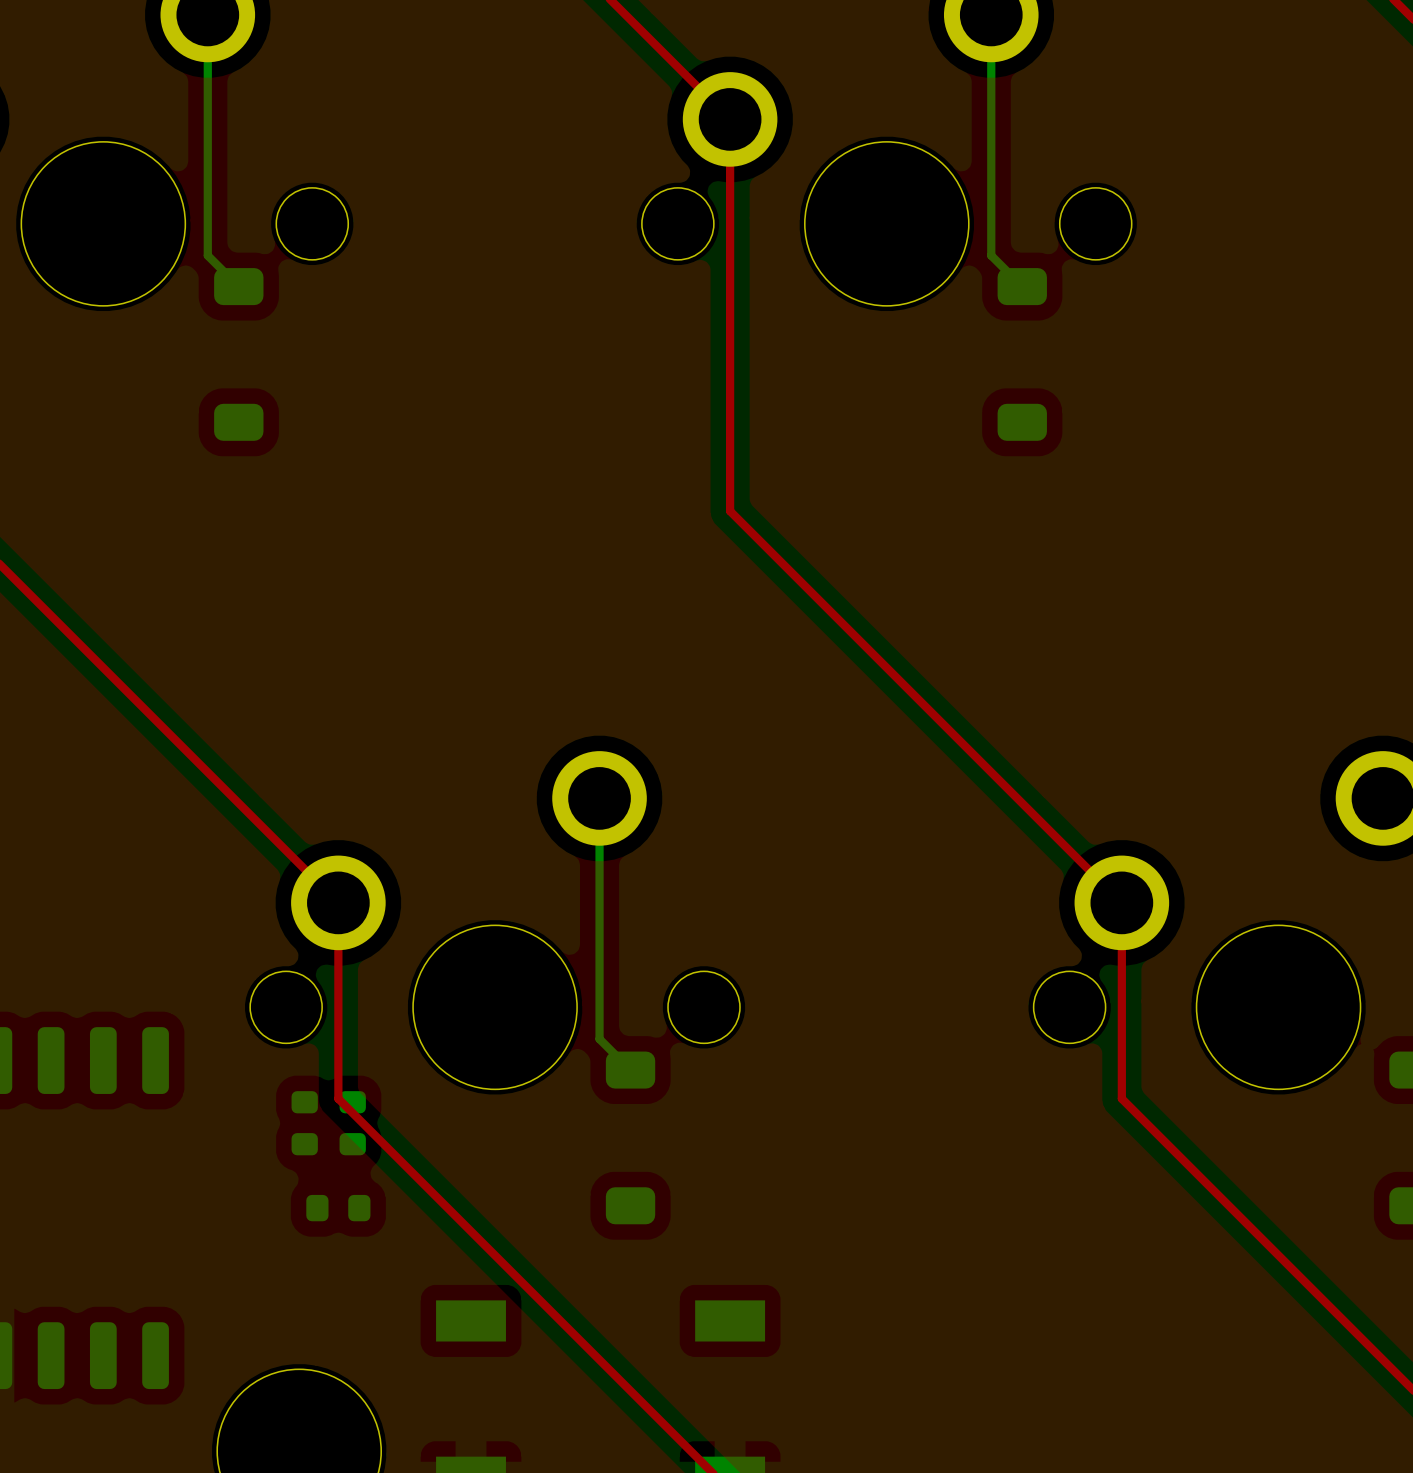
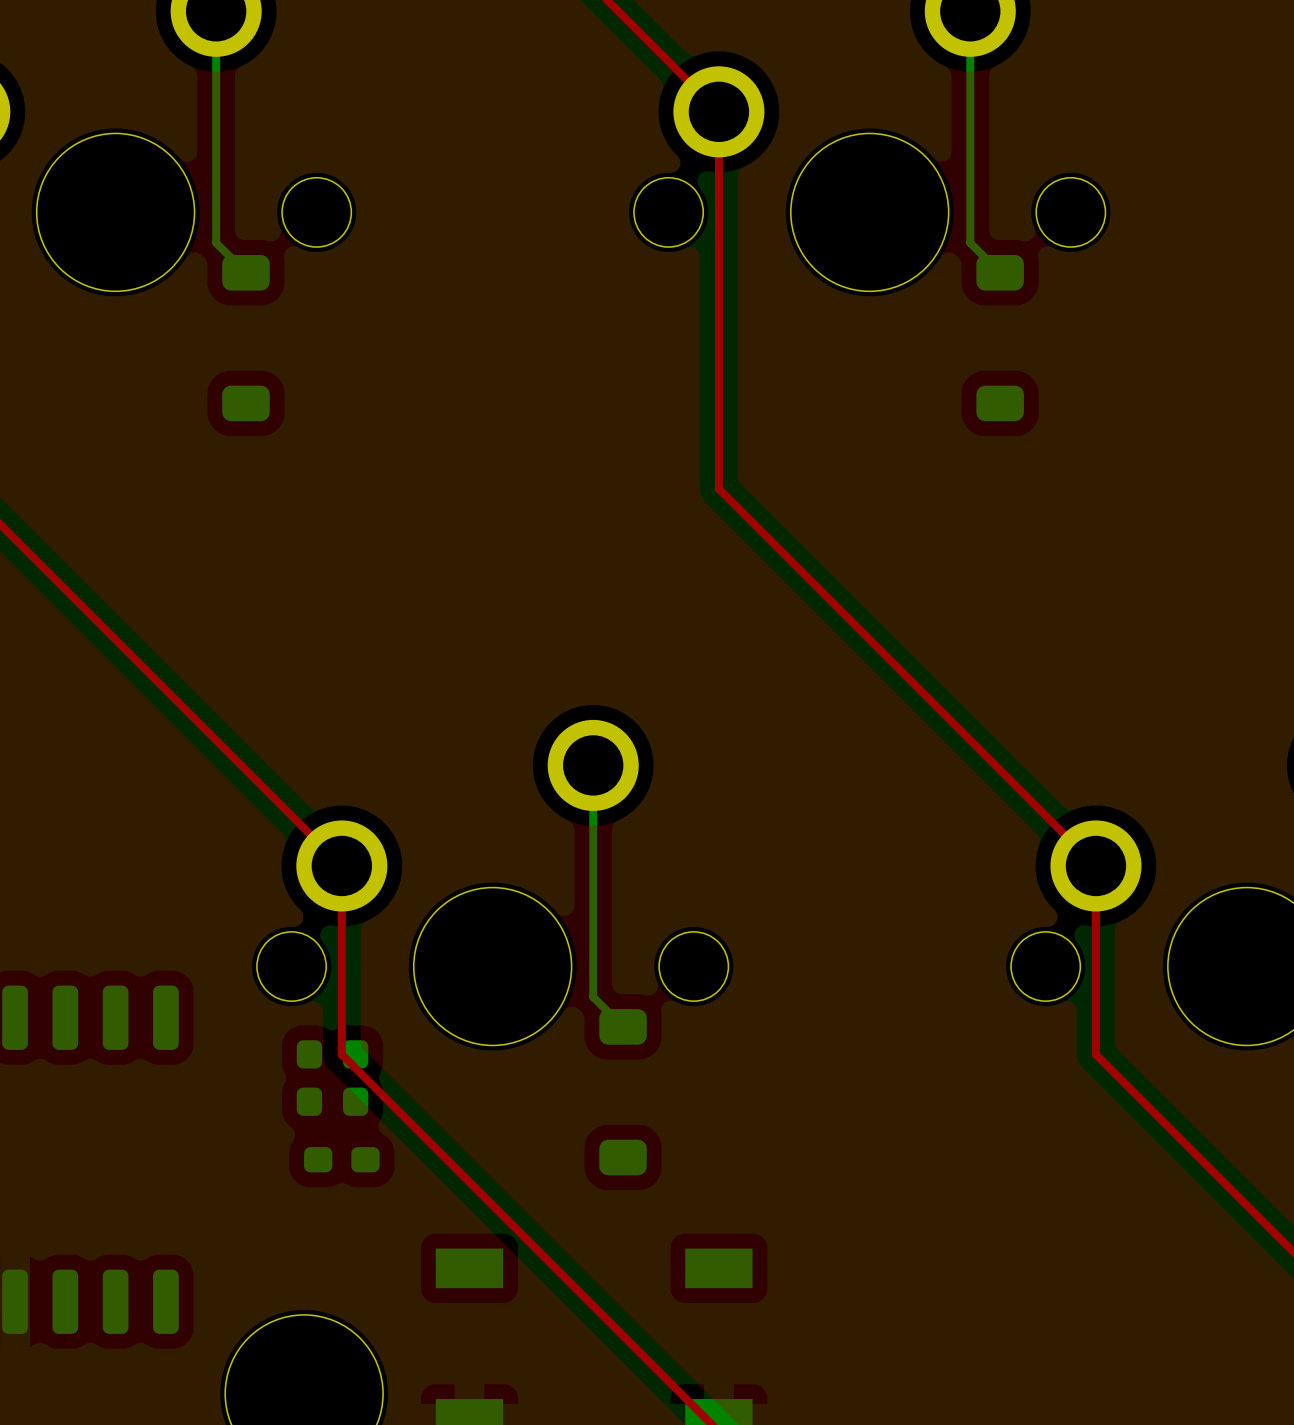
part footprint: [291, 1091, 318, 1156] -> [296, 1040, 323, 1116]
part footprint: [339, 1091, 366, 1156] -> [342, 1040, 369, 1116]
part footprint: [306, 1194, 371, 1222] -> [304, 1147, 380, 1173]

